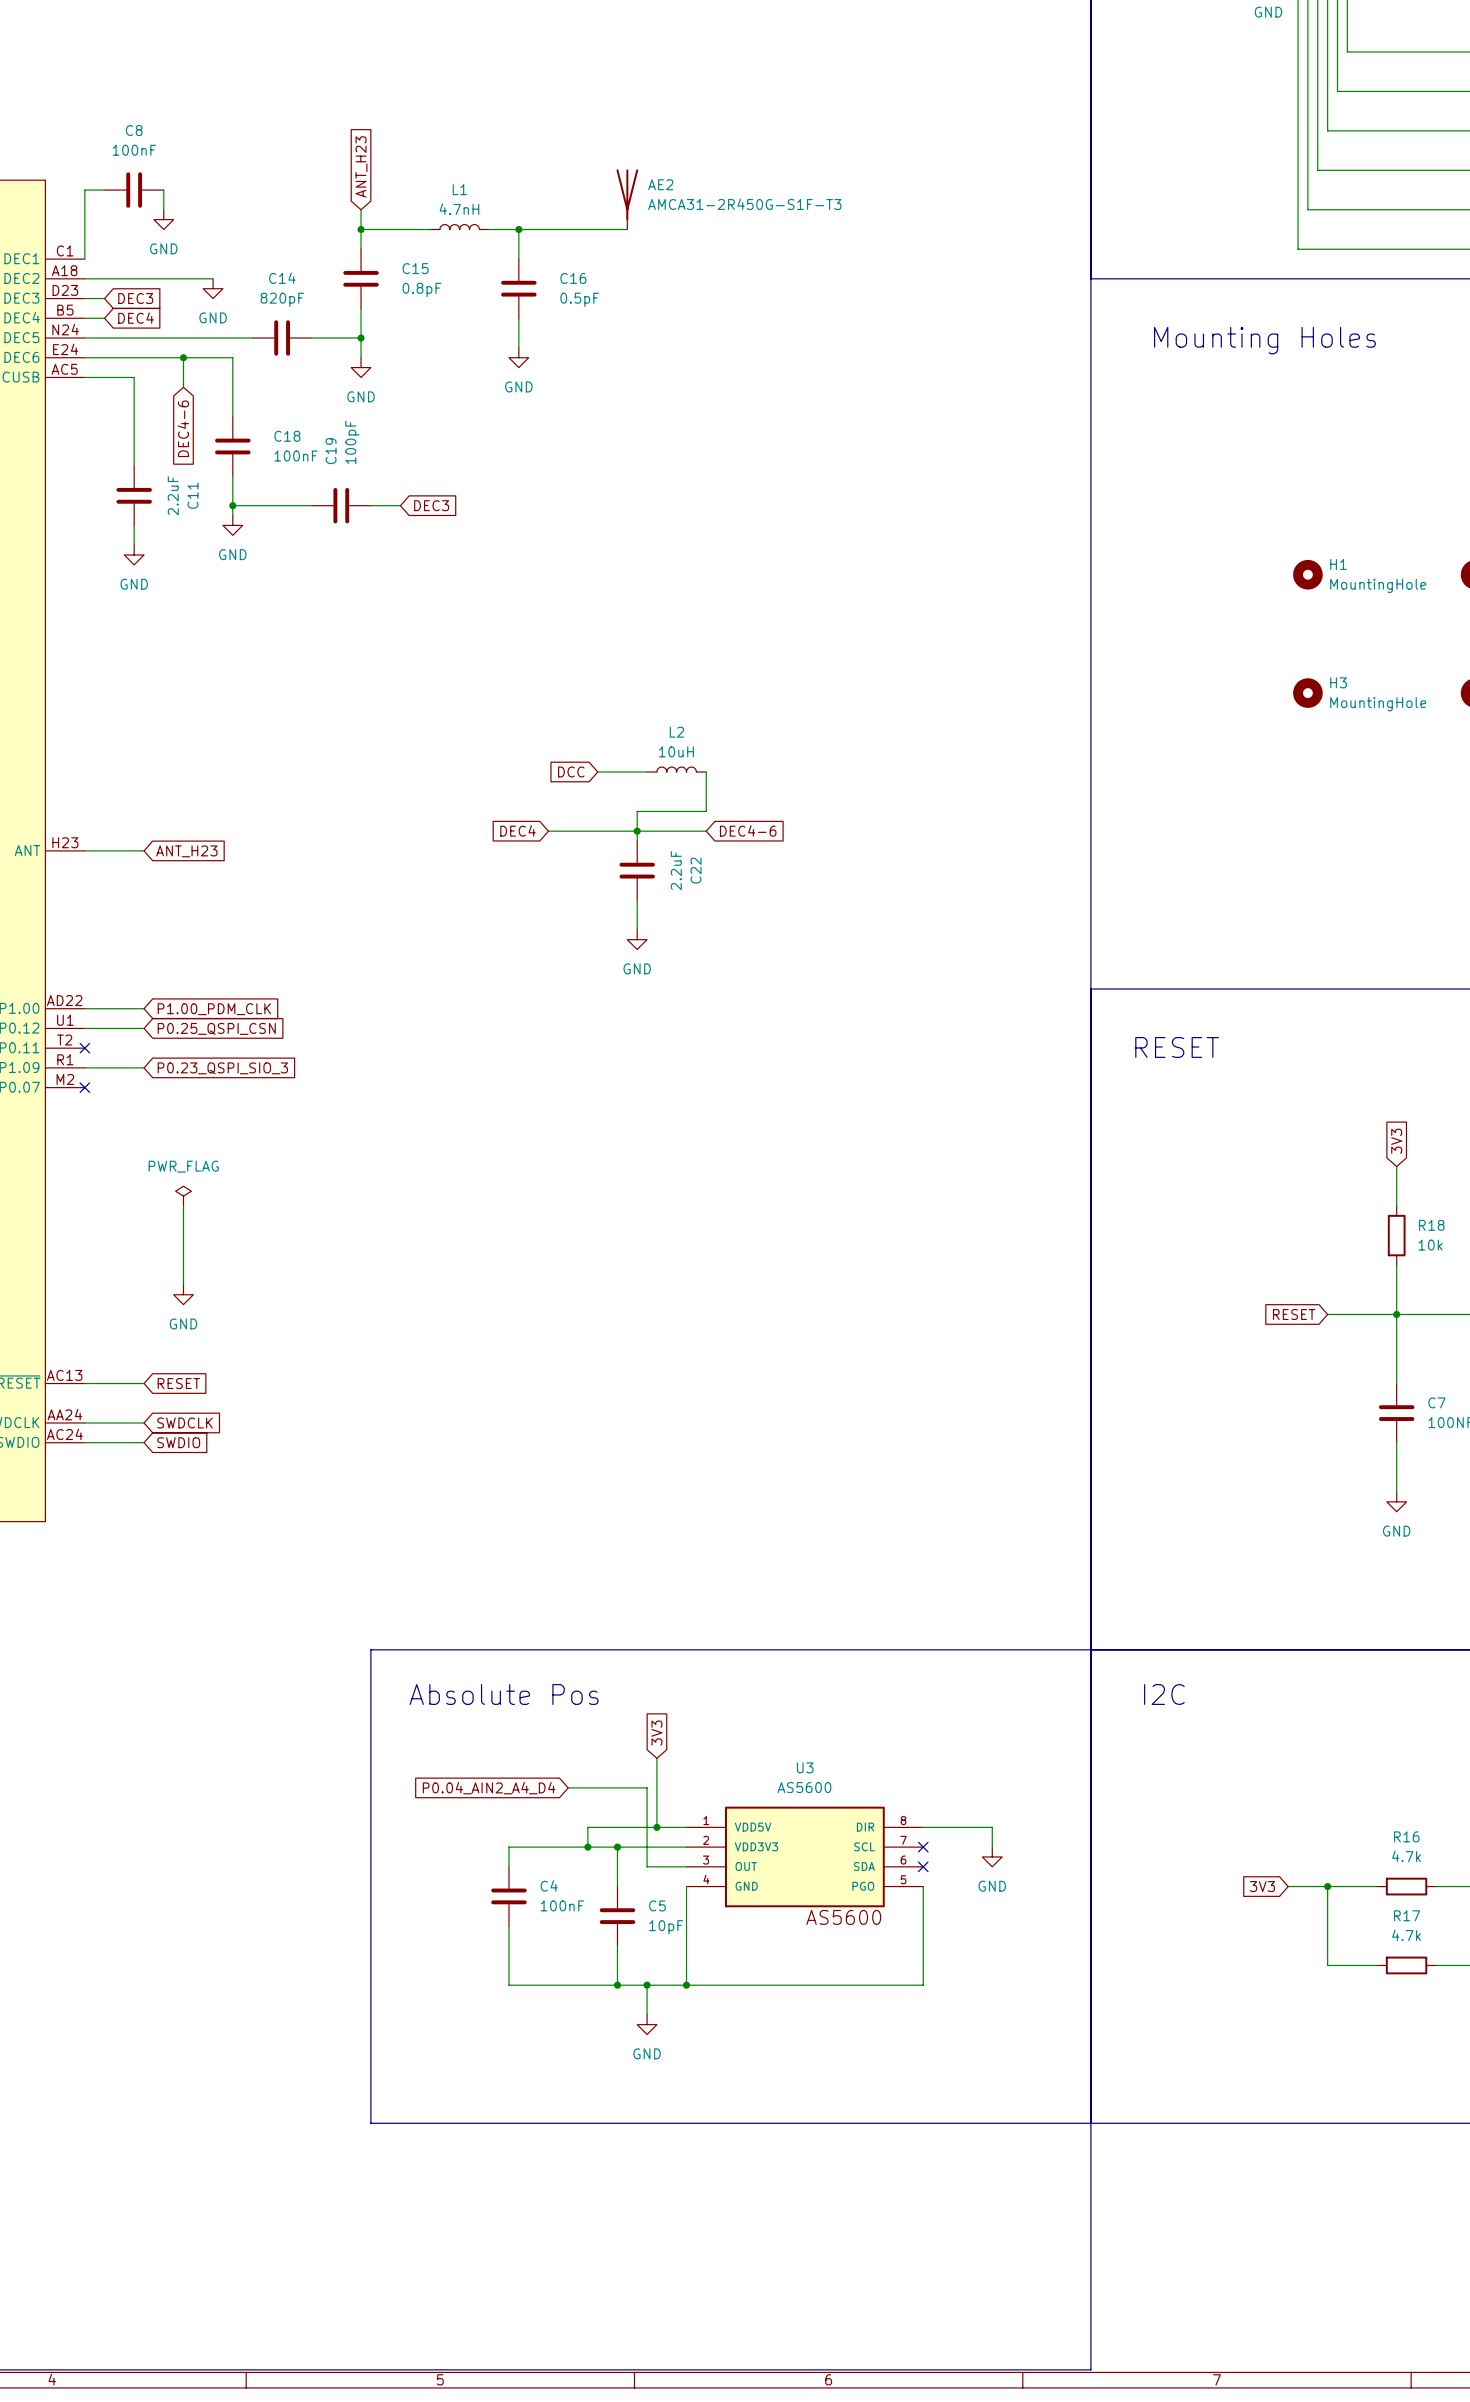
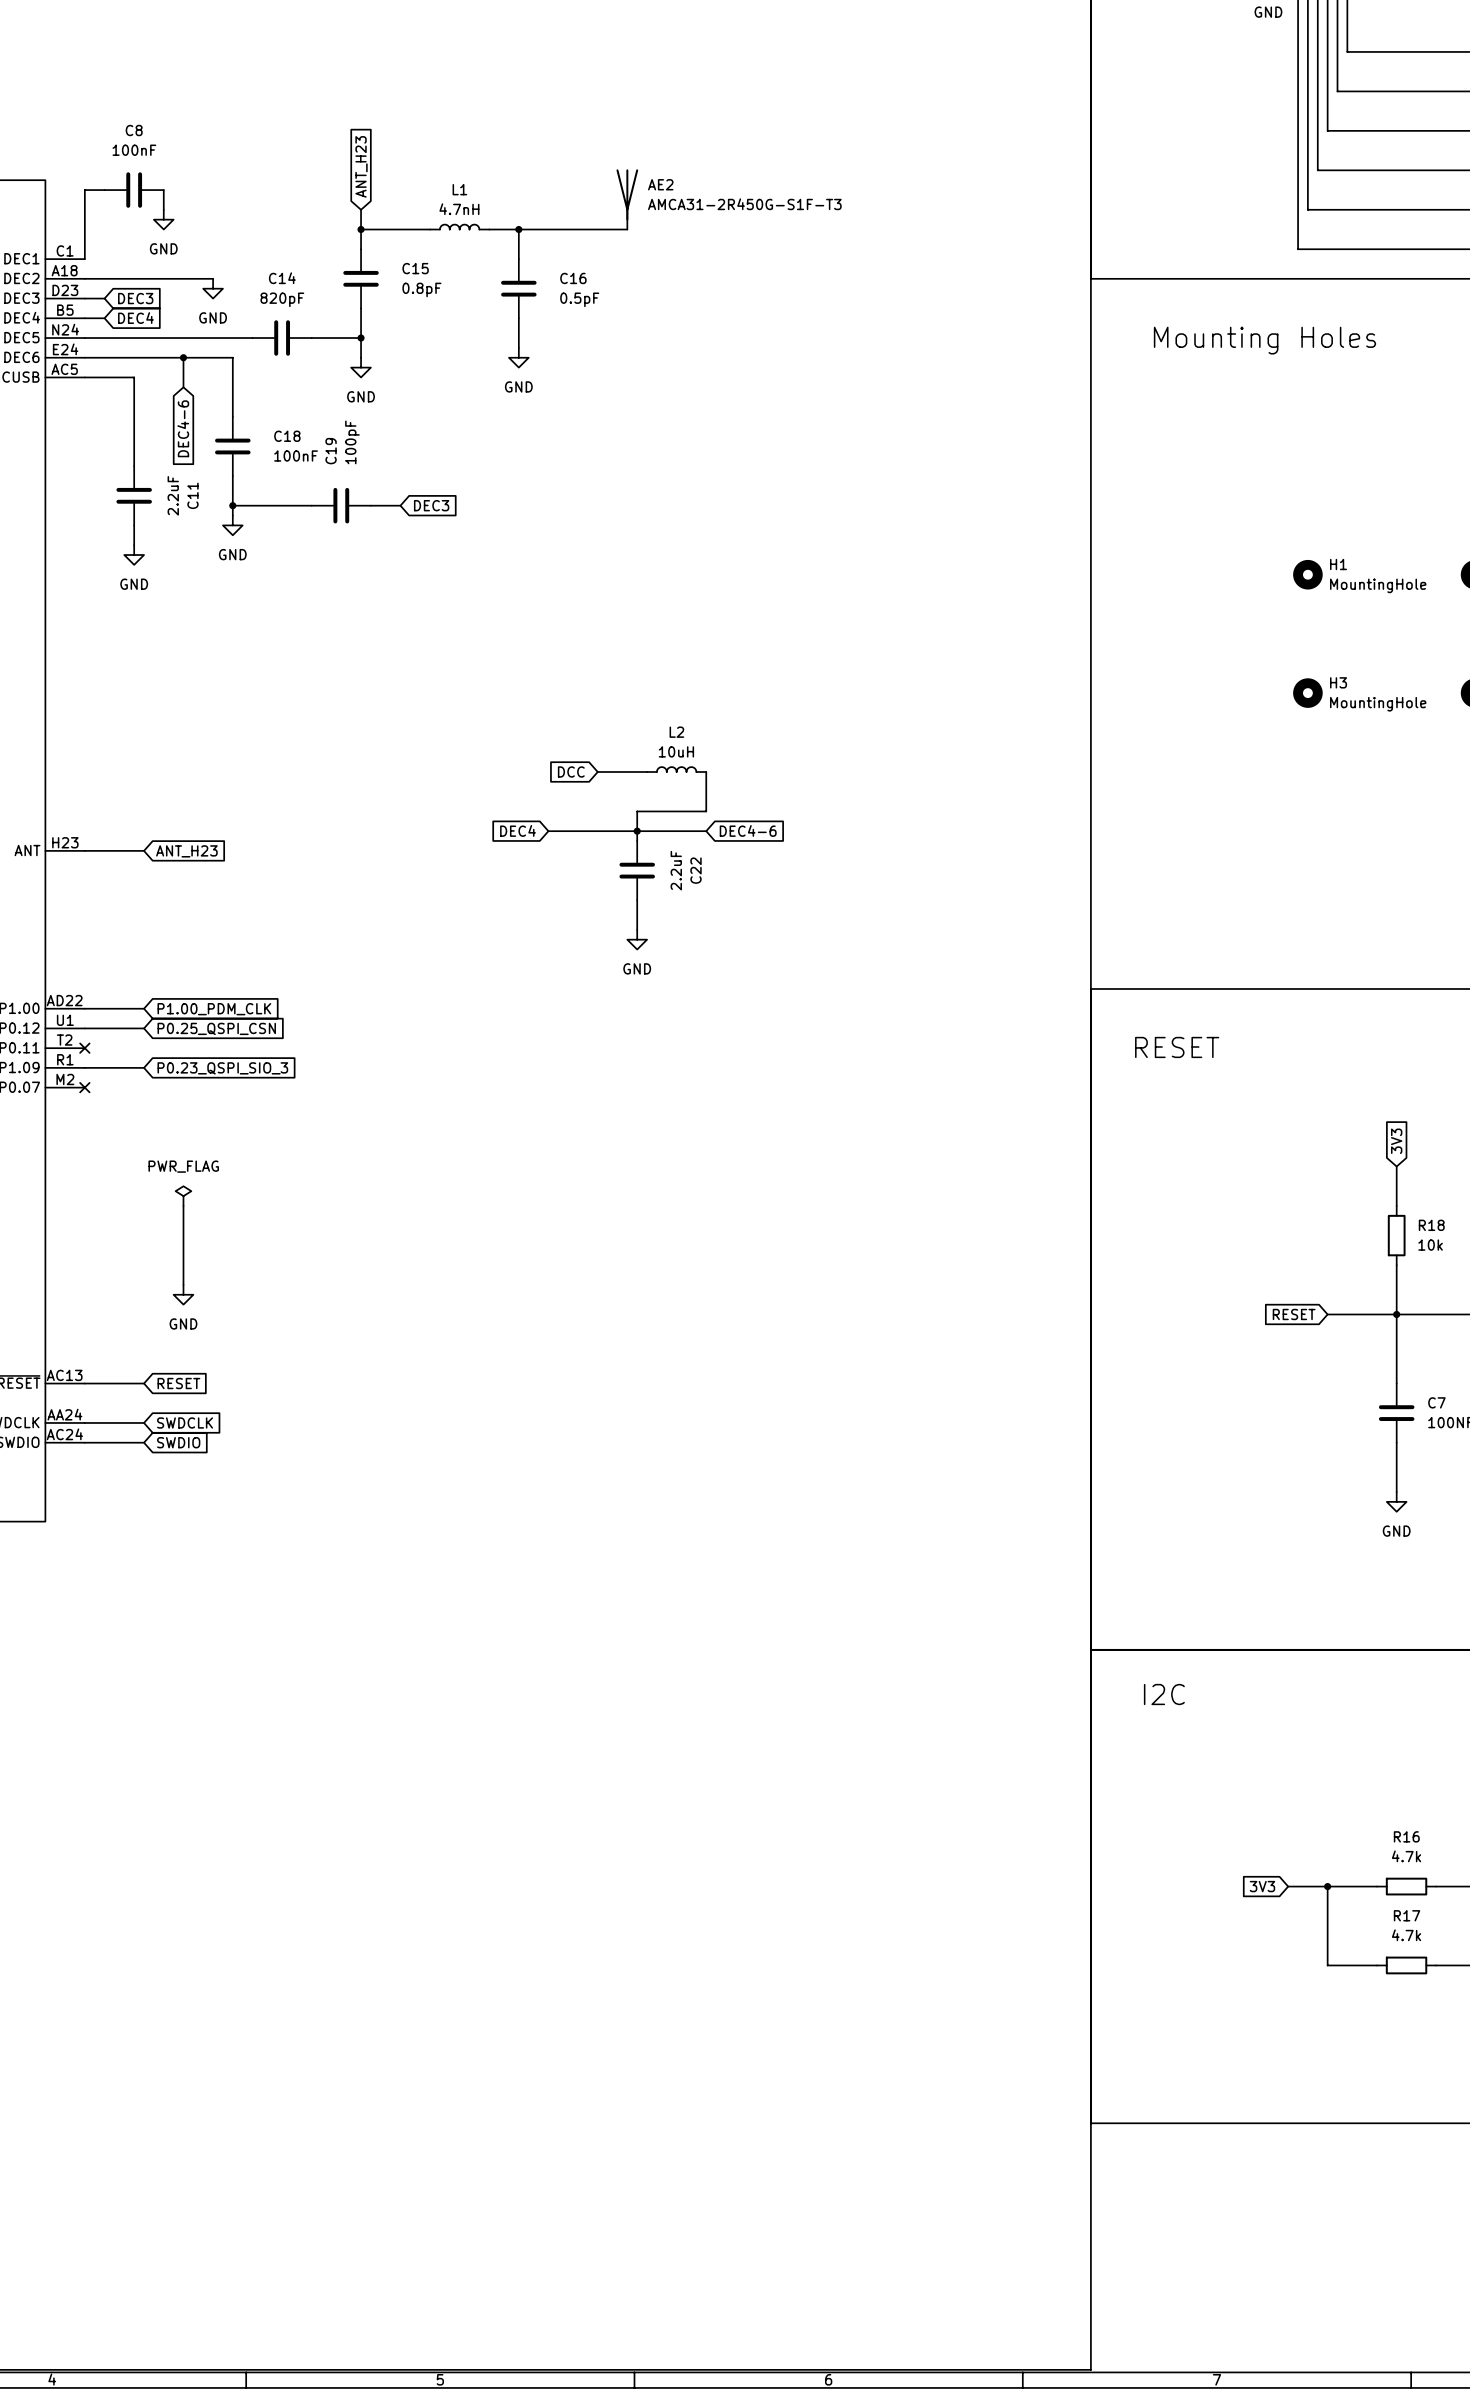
line: (1090, 1649) (370, 1649) (370, 2123) (1090, 2123) -> none
text: Absolute Pos (504, 1694) -> none
global label: 3V3 (656, 1733) -> none
wire: (656, 1758) (656, 1827) -> none
wire: (568, 1787) (647, 1787) (647, 1866) (686, 1866) -> none
global label: P0.04_AIN2_A4_D4 (489, 1788) -> none
junction: (656, 1827) -> none
wire: (686, 1827) (587, 1827) (587, 1847) -> none
wire: (923, 1827) (992, 1827) (992, 1847) -> none
junction: (587, 1847) -> none
wire: (617, 1847) (617, 1886) -> none
junction: (617, 1847) -> none
wire: (686, 1847) (508, 1847) (508, 1866) -> none
no-connect mark: (923, 1847) -> none
U3: AS5600 (804, 1856) -> none
power symbol: GND (992, 1856) -> none
no-connect mark: (923, 1866) -> none
wire: (686, 1886) (686, 1985) -> none
wire: (923, 1886) (923, 1985) (508, 1985) (508, 1926) -> none
C4: 100nF (508, 1896) -> none
C5: 10pF (617, 1916) -> none
wire: (617, 1945) (617, 1985) -> none
junction: (617, 1985) -> none
wire: (647, 1985) (647, 2014) -> none
junction: (647, 1985) -> none
junction: (686, 1985) -> none
power symbol: GND (647, 2024) -> none

